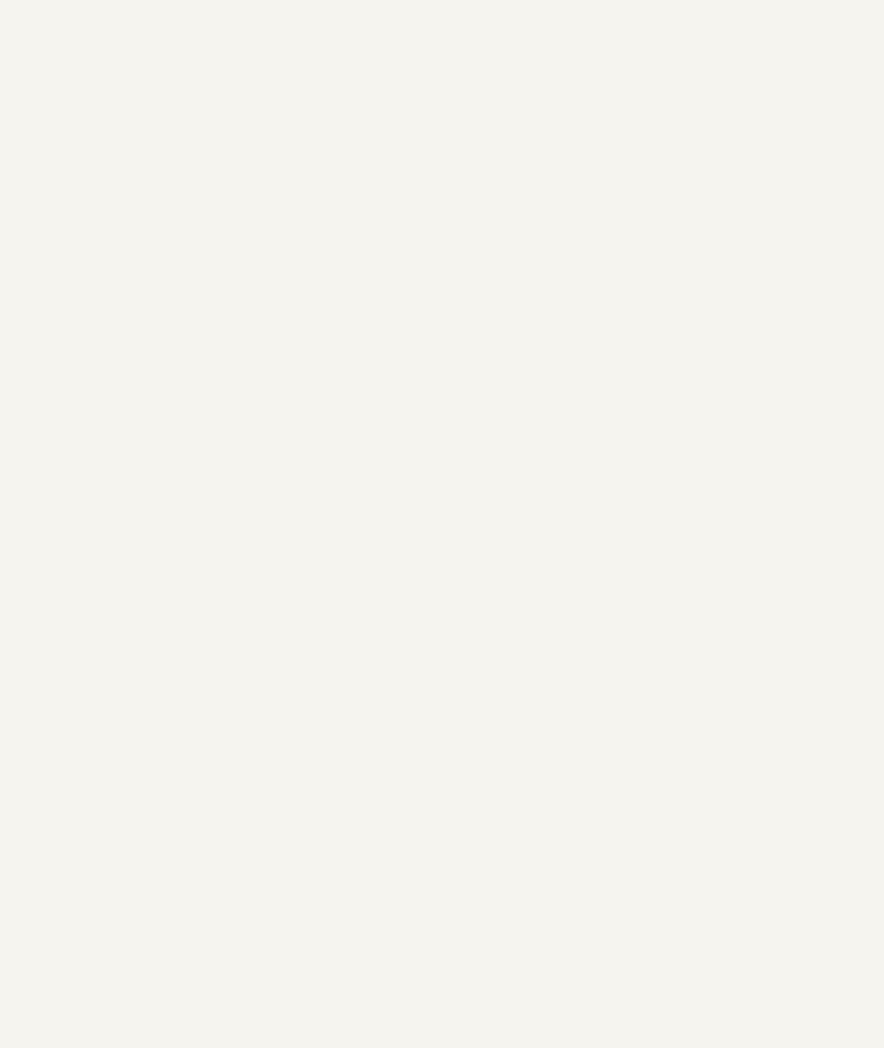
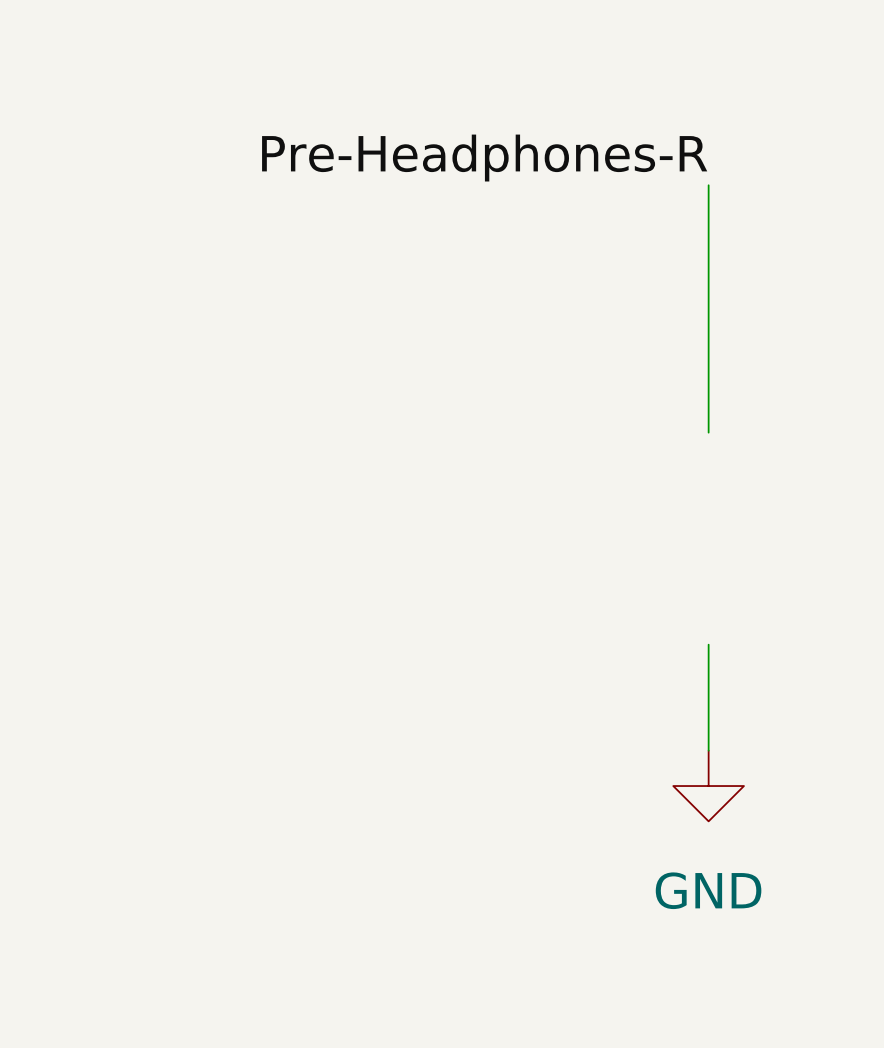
label: none -> Pre-Headphones-R (484, 158)
wire: none -> (708, 185) (708, 432)
wire: none -> (708, 644) (708, 750)
power symbol: none -> GND (708, 786)

